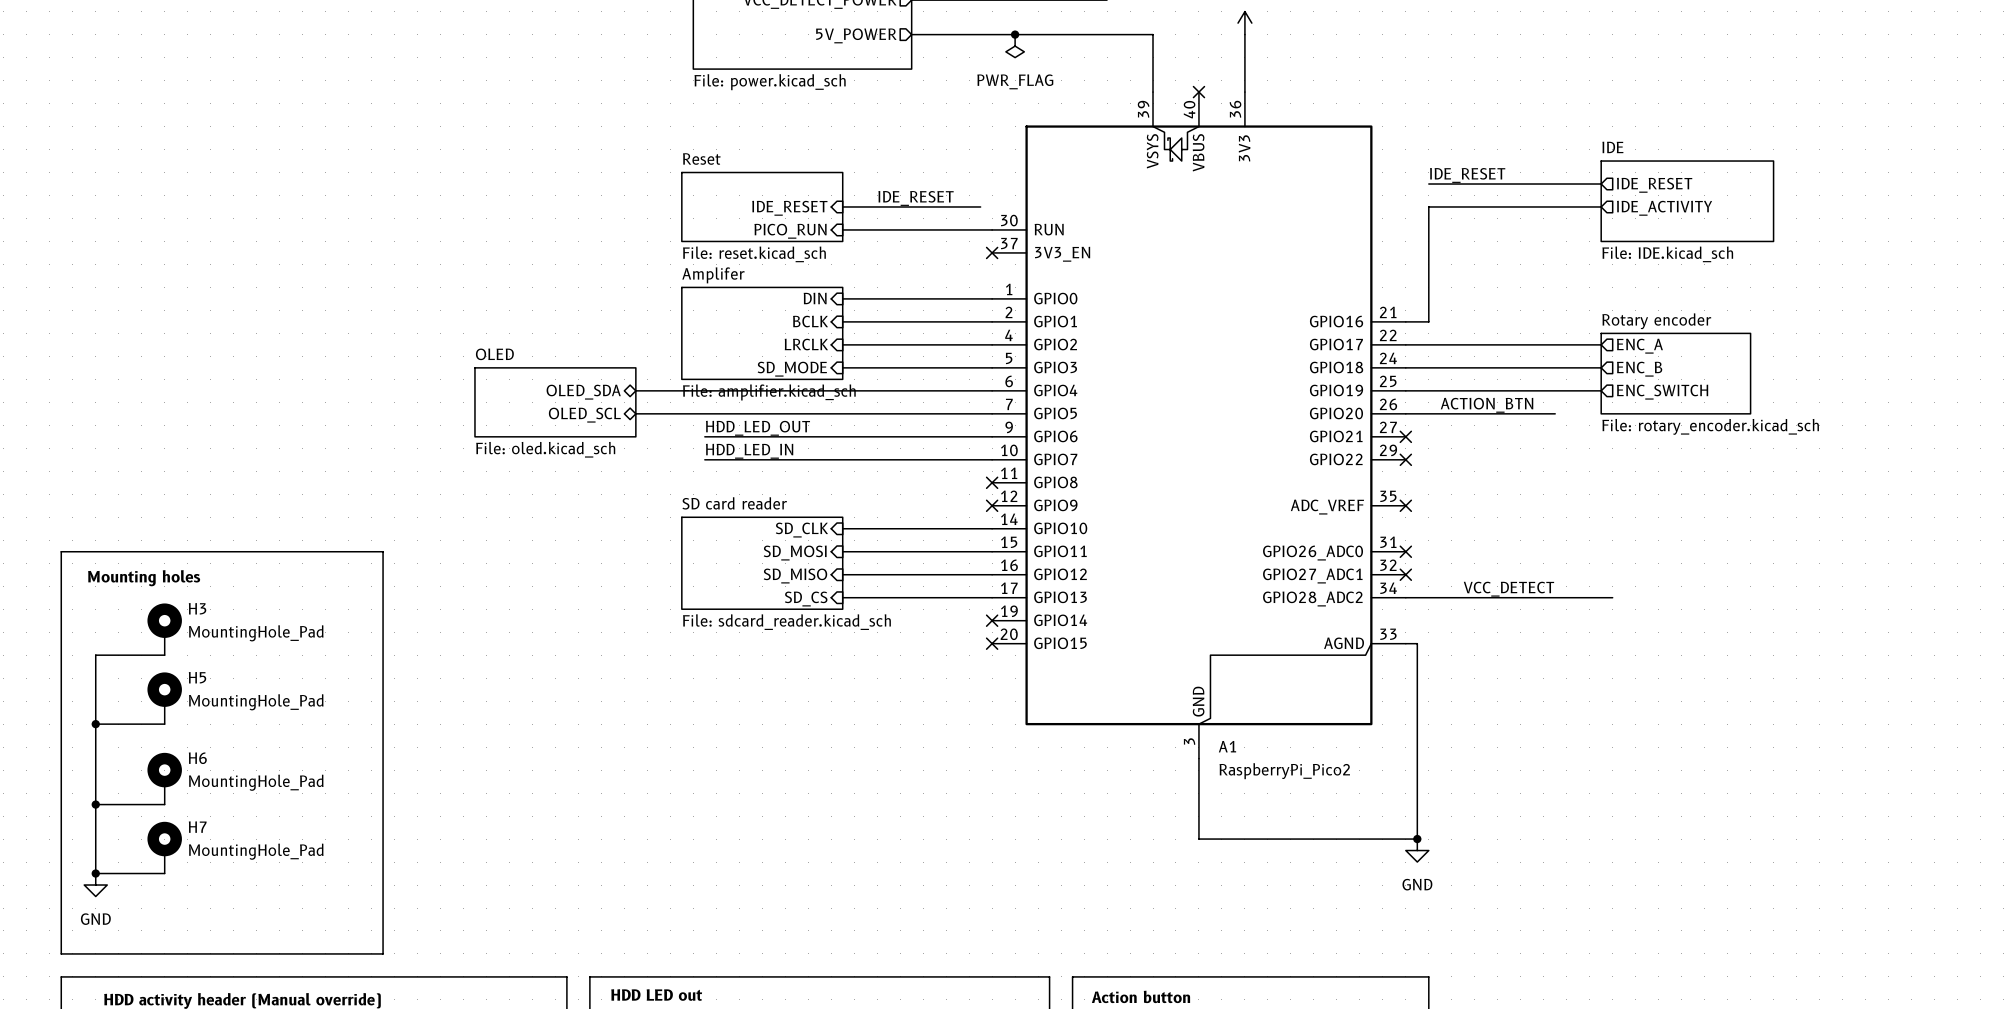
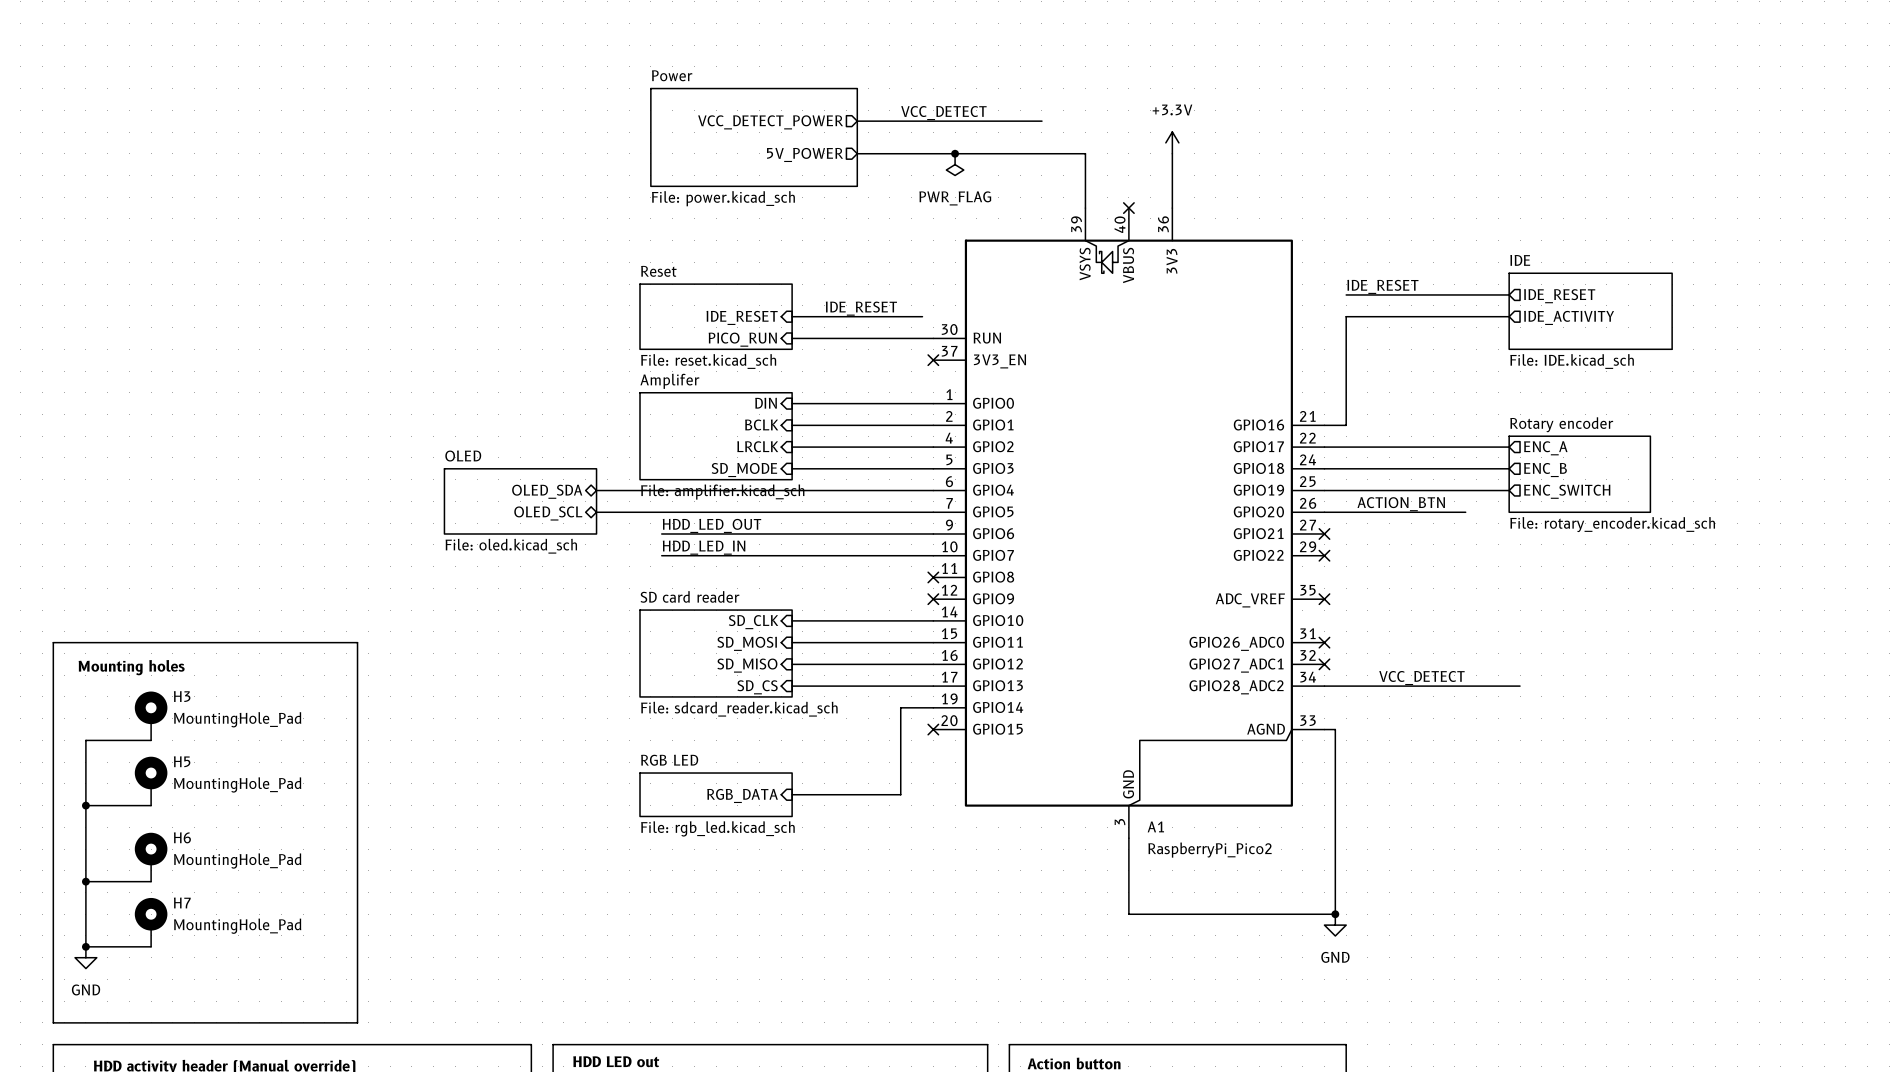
wire: none -> (933, 707) (900, 707) (900, 794) (792, 794)
no-connect mark: (992, 620) -> none
sheet RGB LED: none -> File: rgb_led.kicad_sch (716, 794)
sheet pin: none -> RGB_DATA (742, 795)

